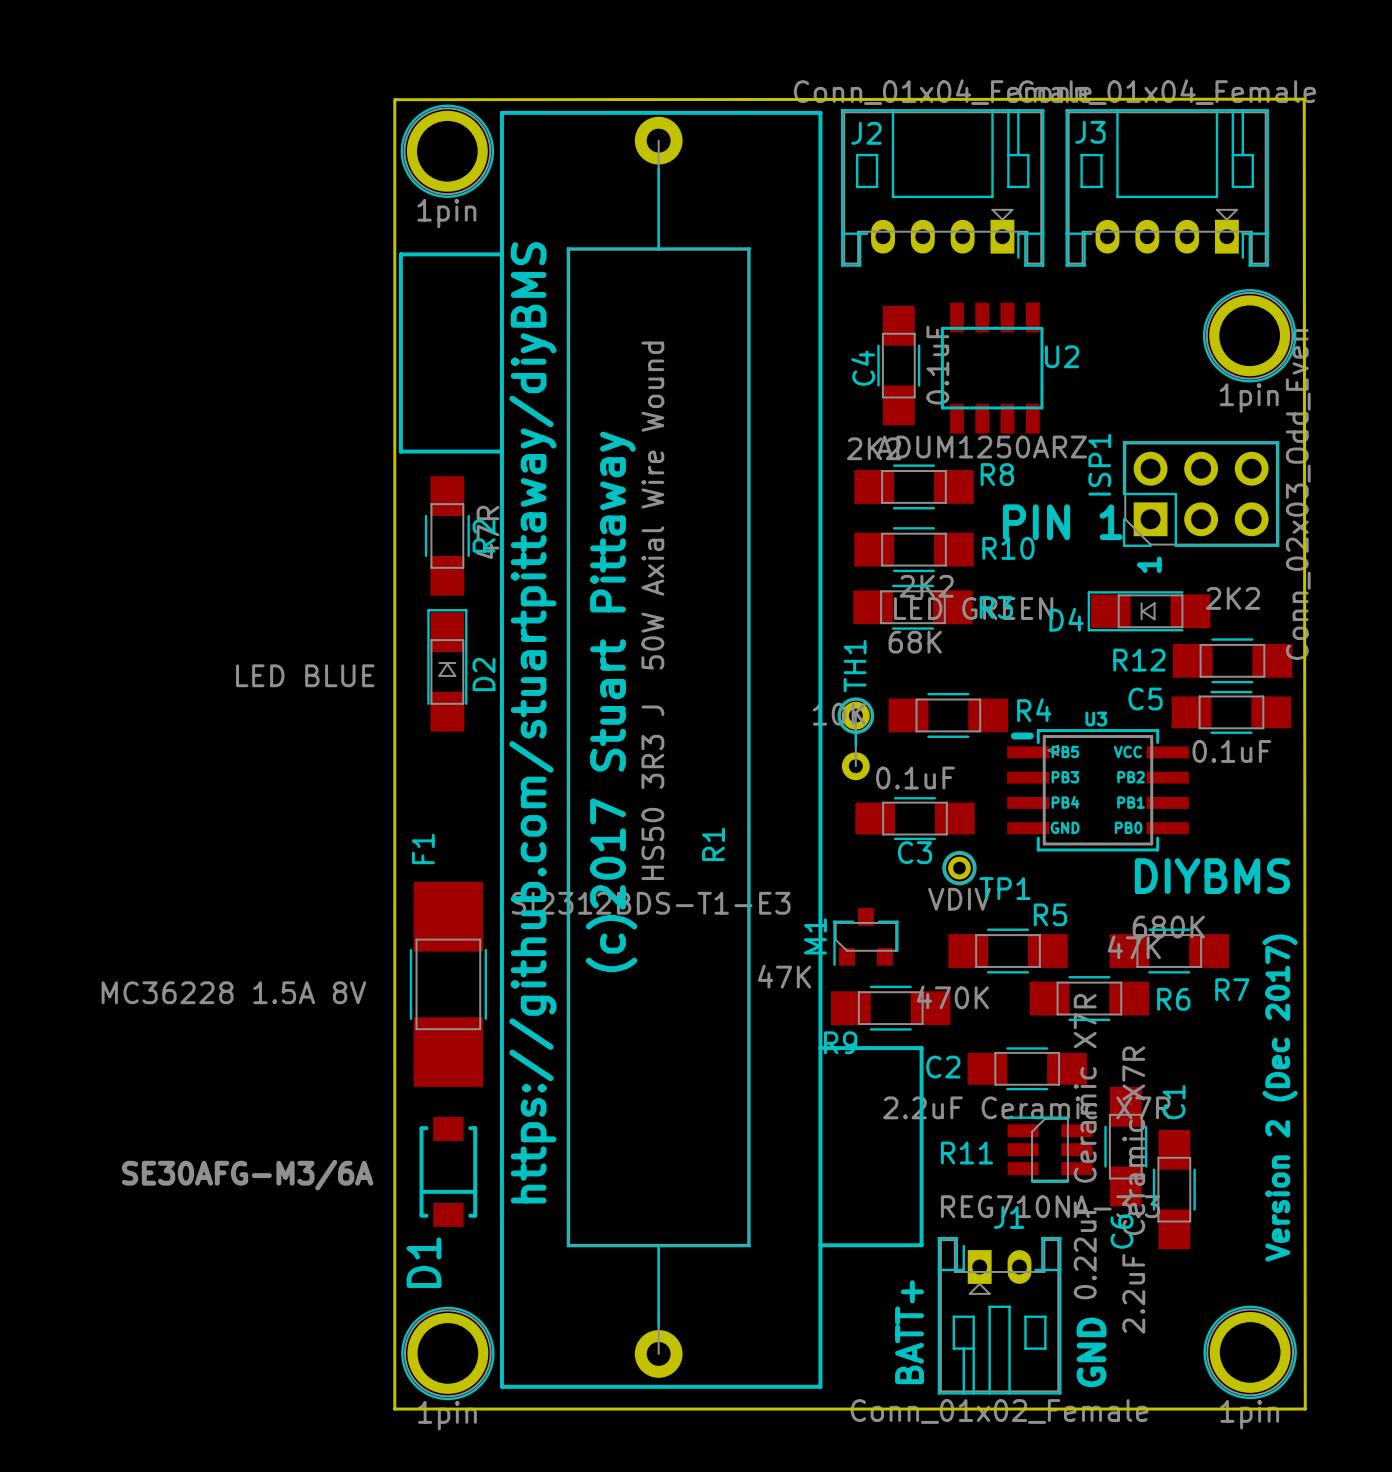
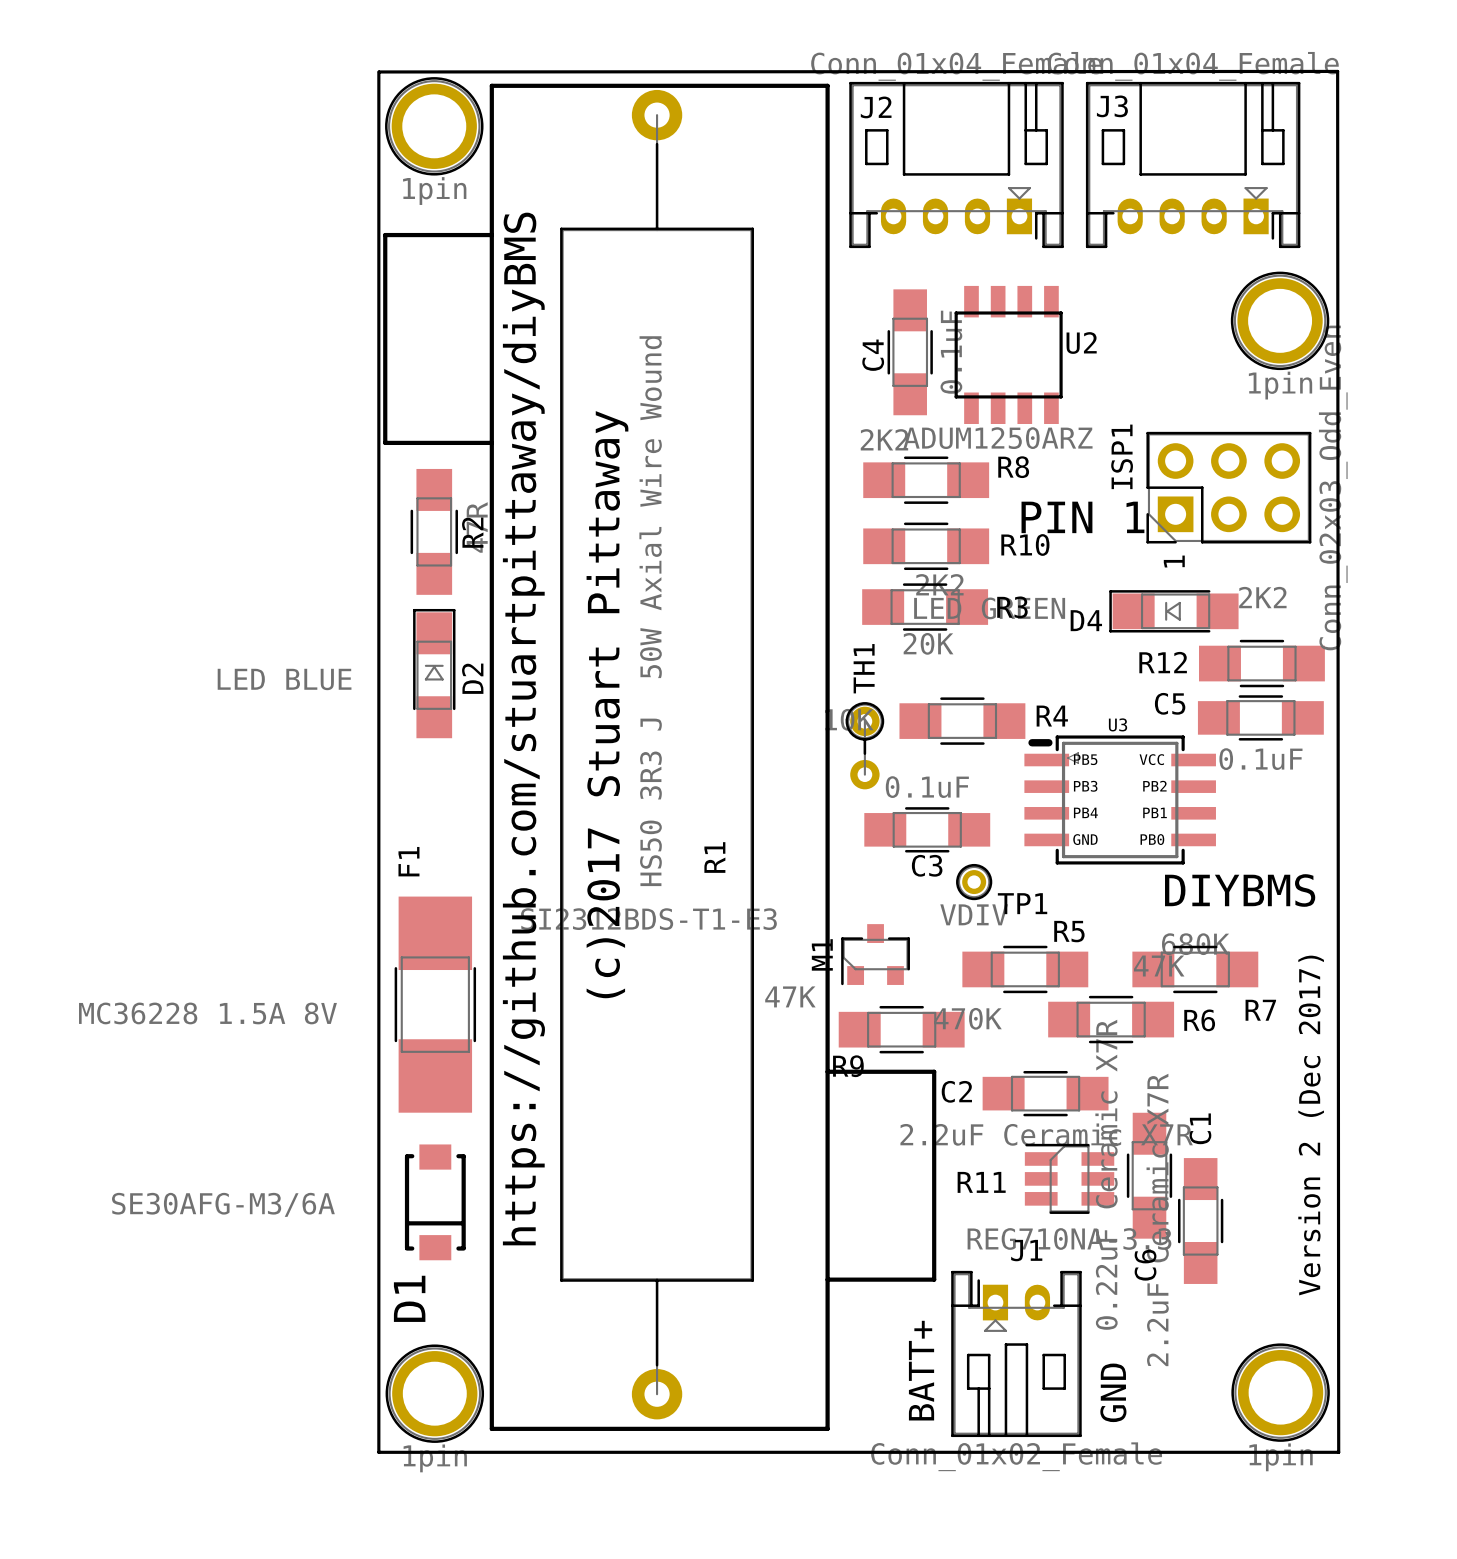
R3 value: 68K (915, 642) -> 20K (928, 643)

